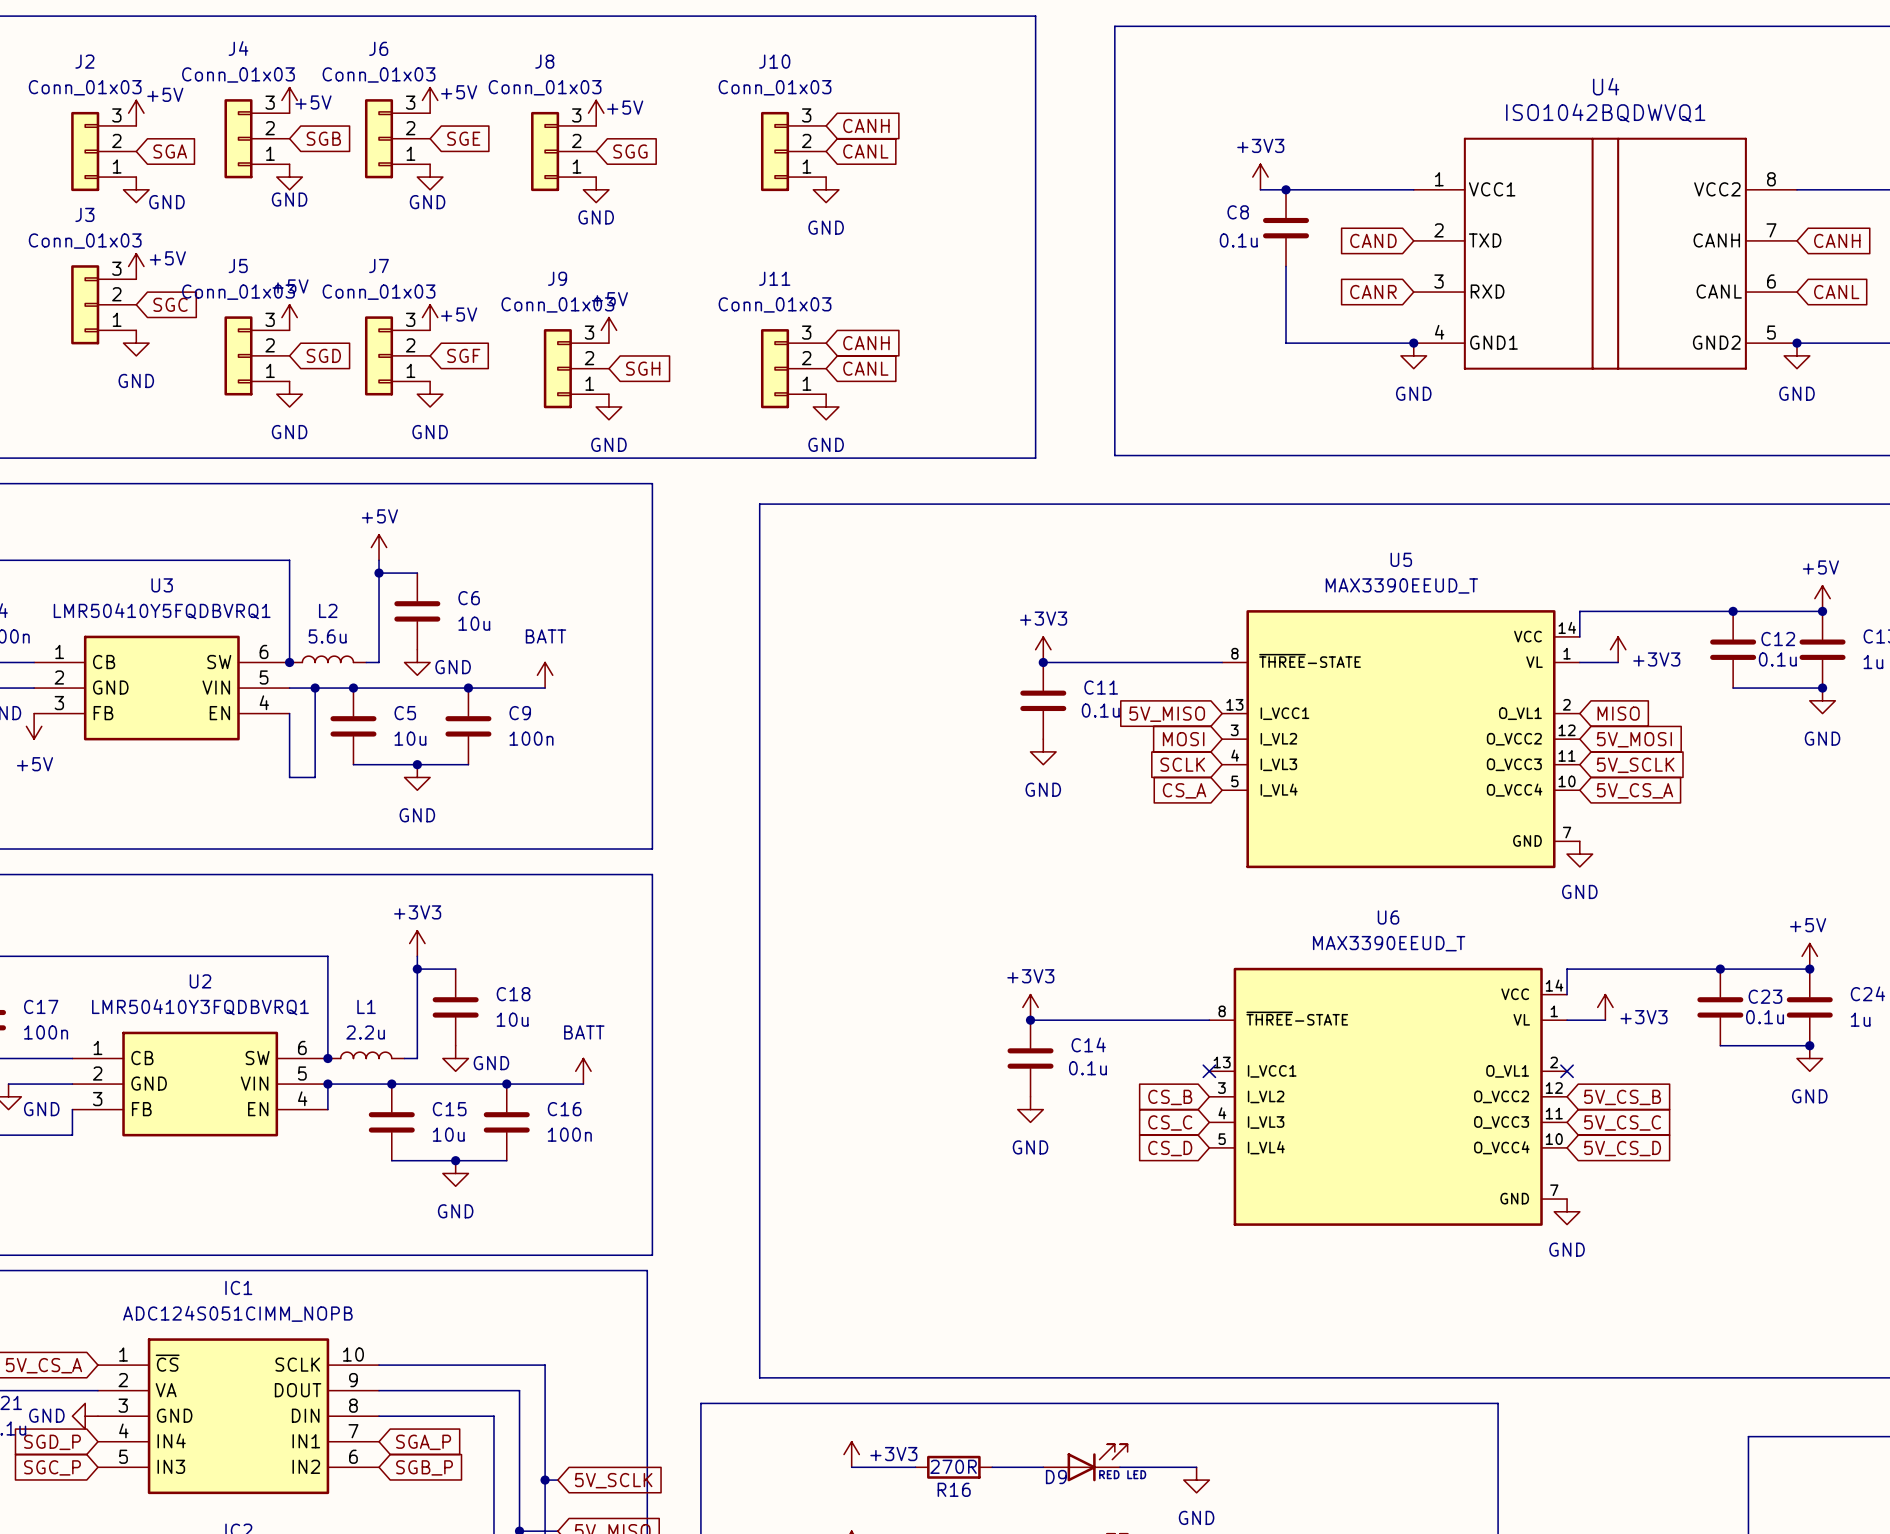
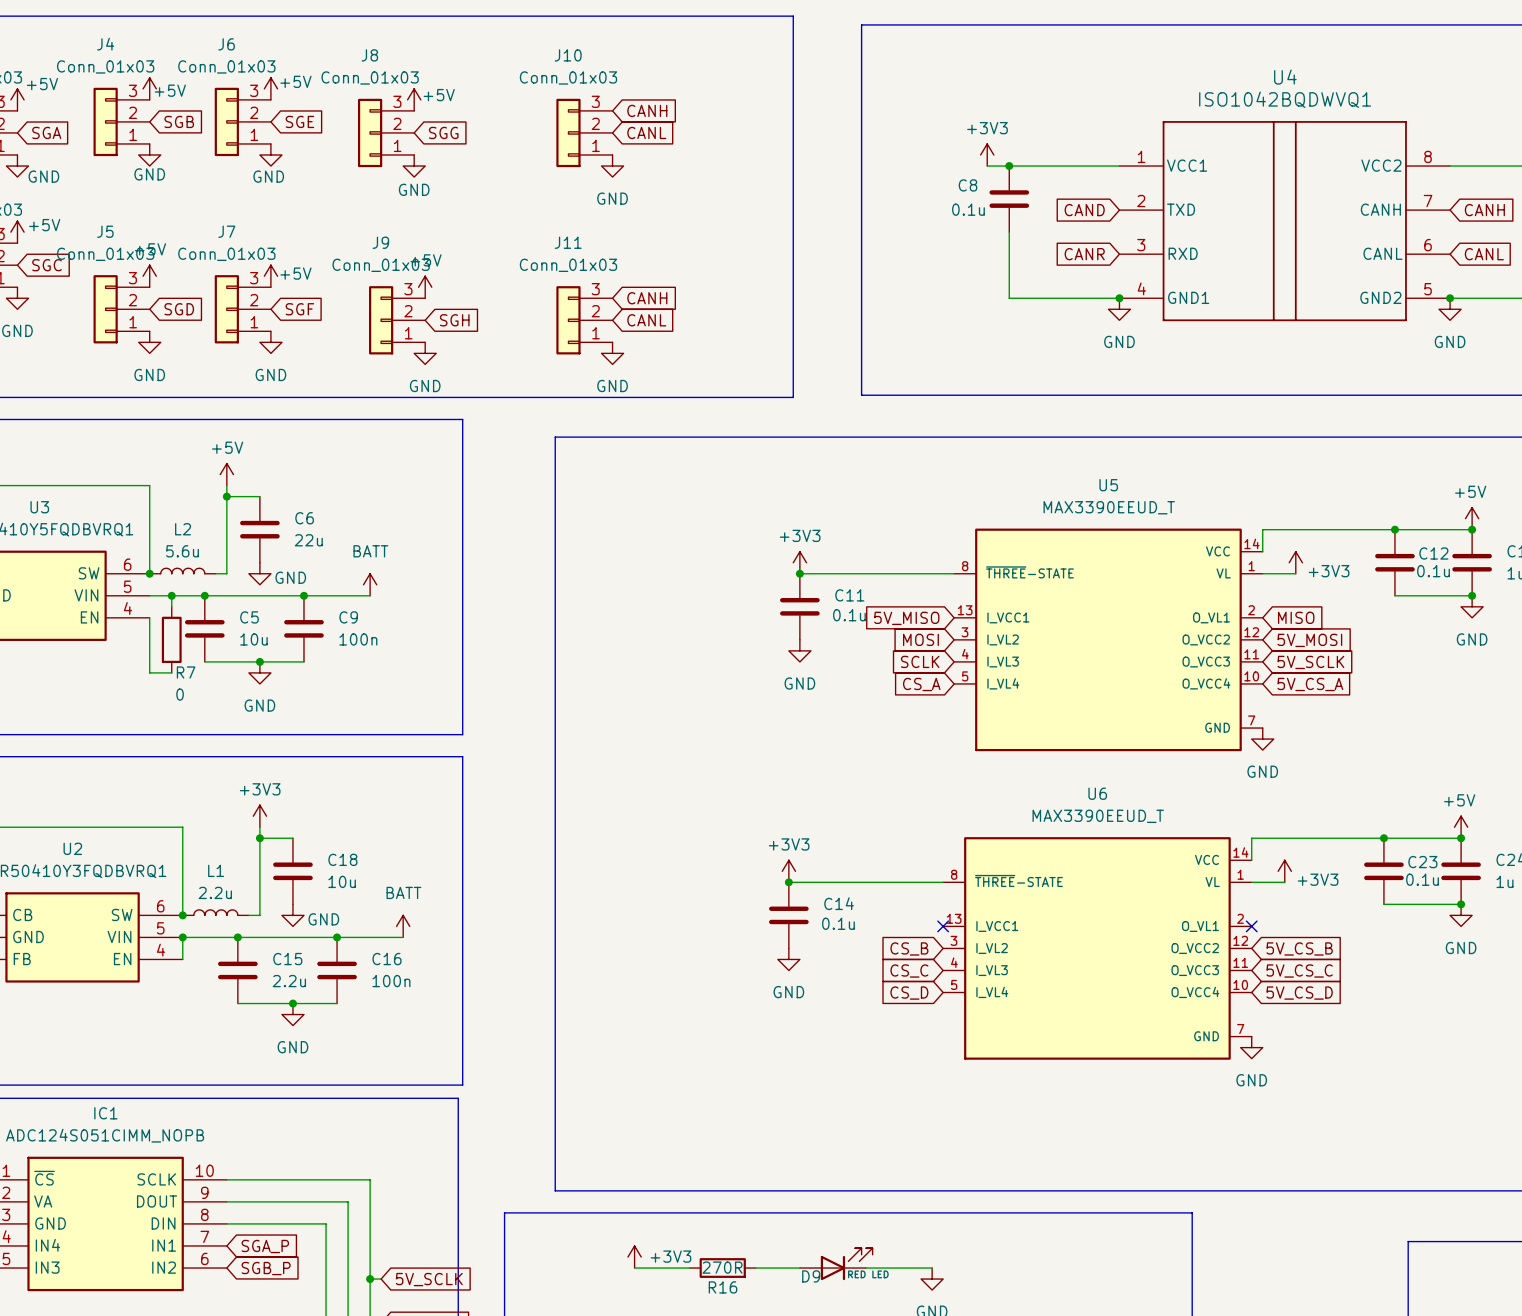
C6 value: 10u (474, 623) -> 22u (308, 540)
wire: (315, 700) (315, 777) -> none
R7: none -> 0 (171, 639)
C15 value: 10u (448, 1134) -> 2.2u (289, 981)

